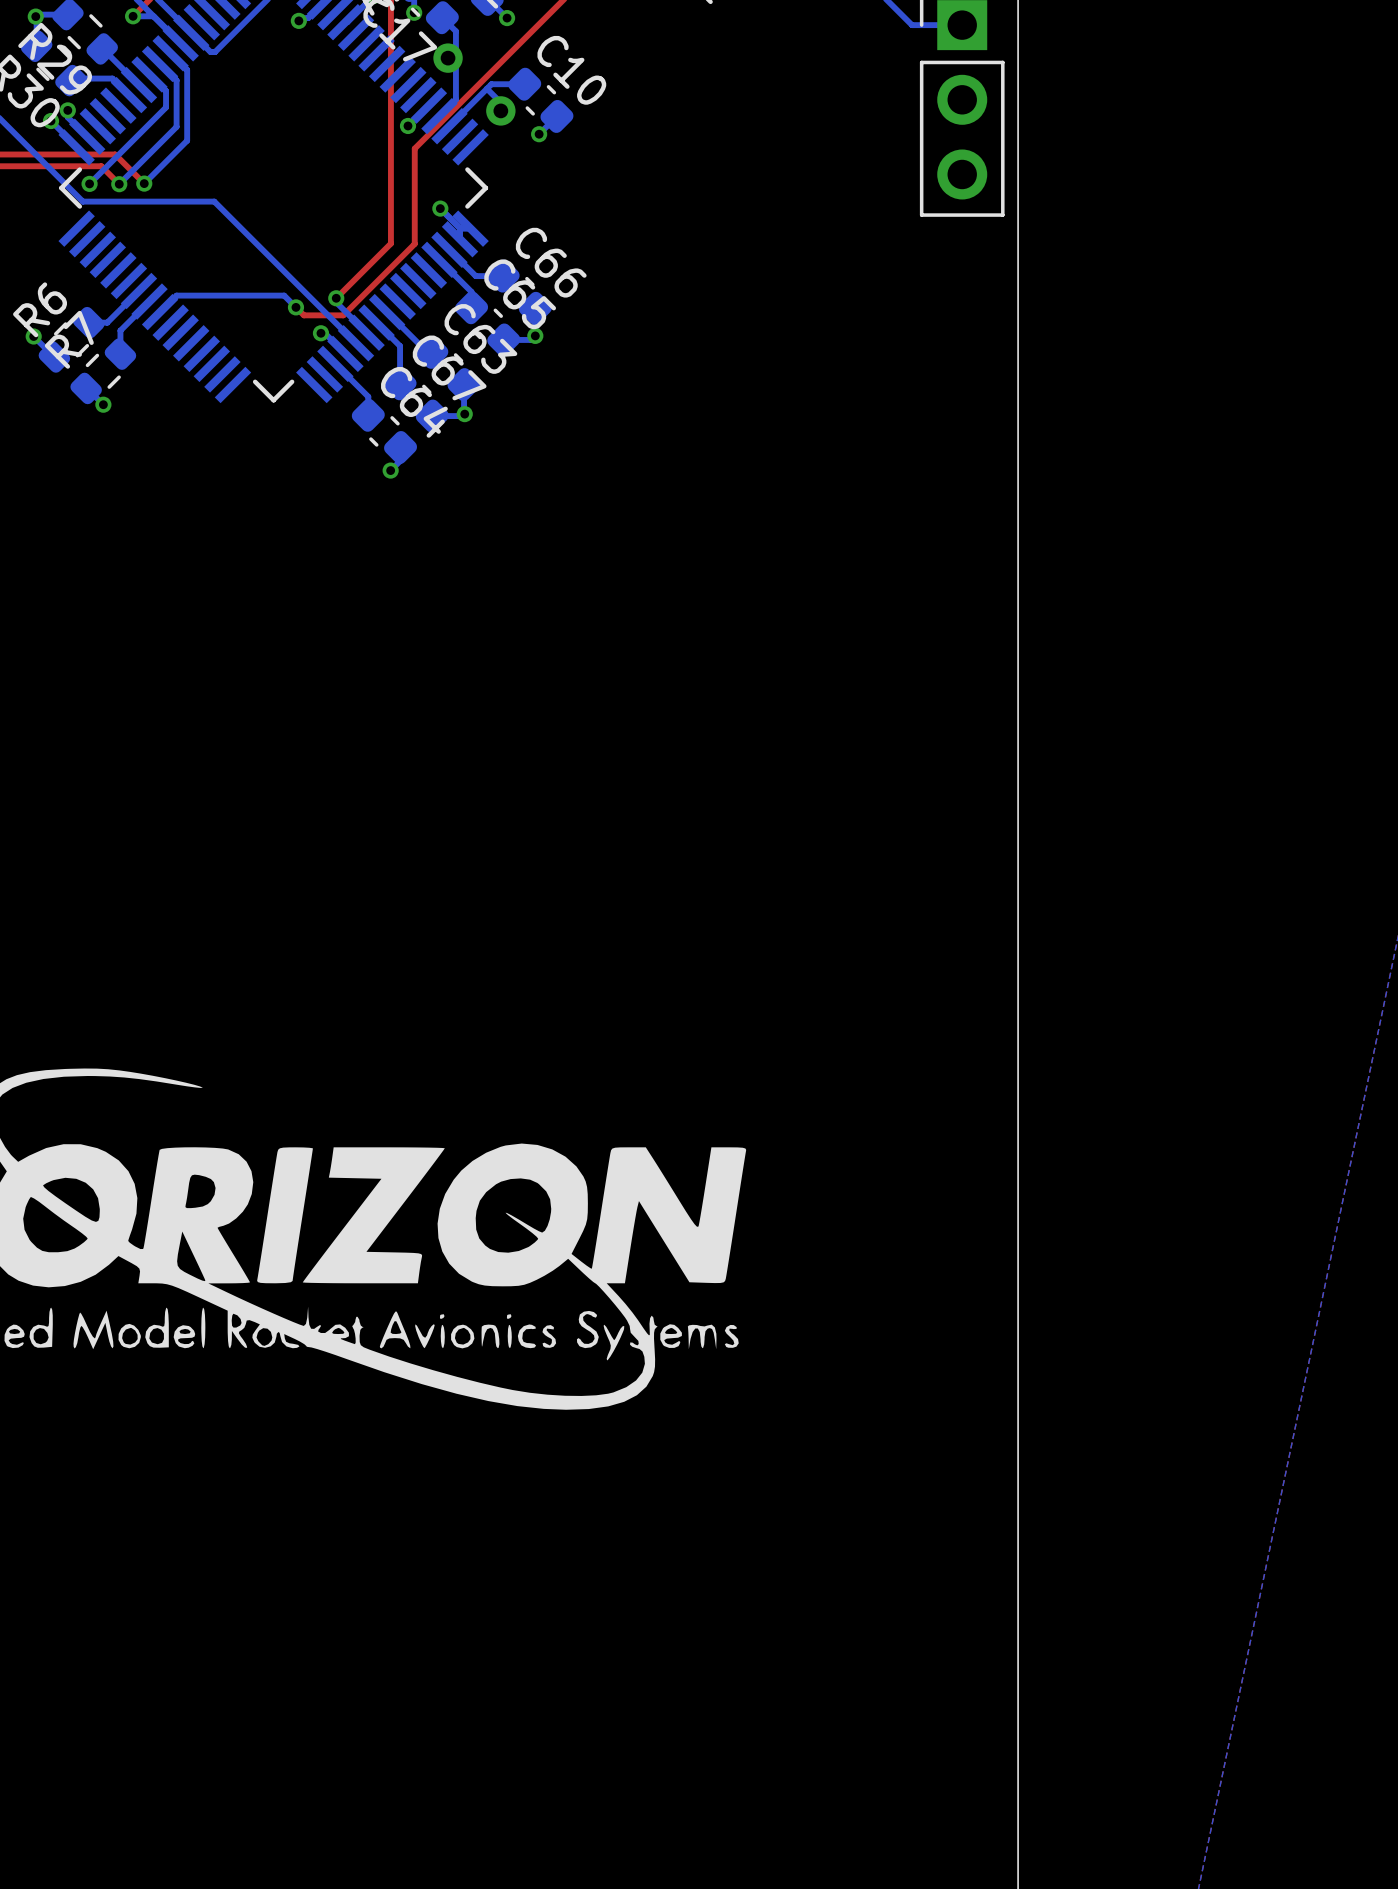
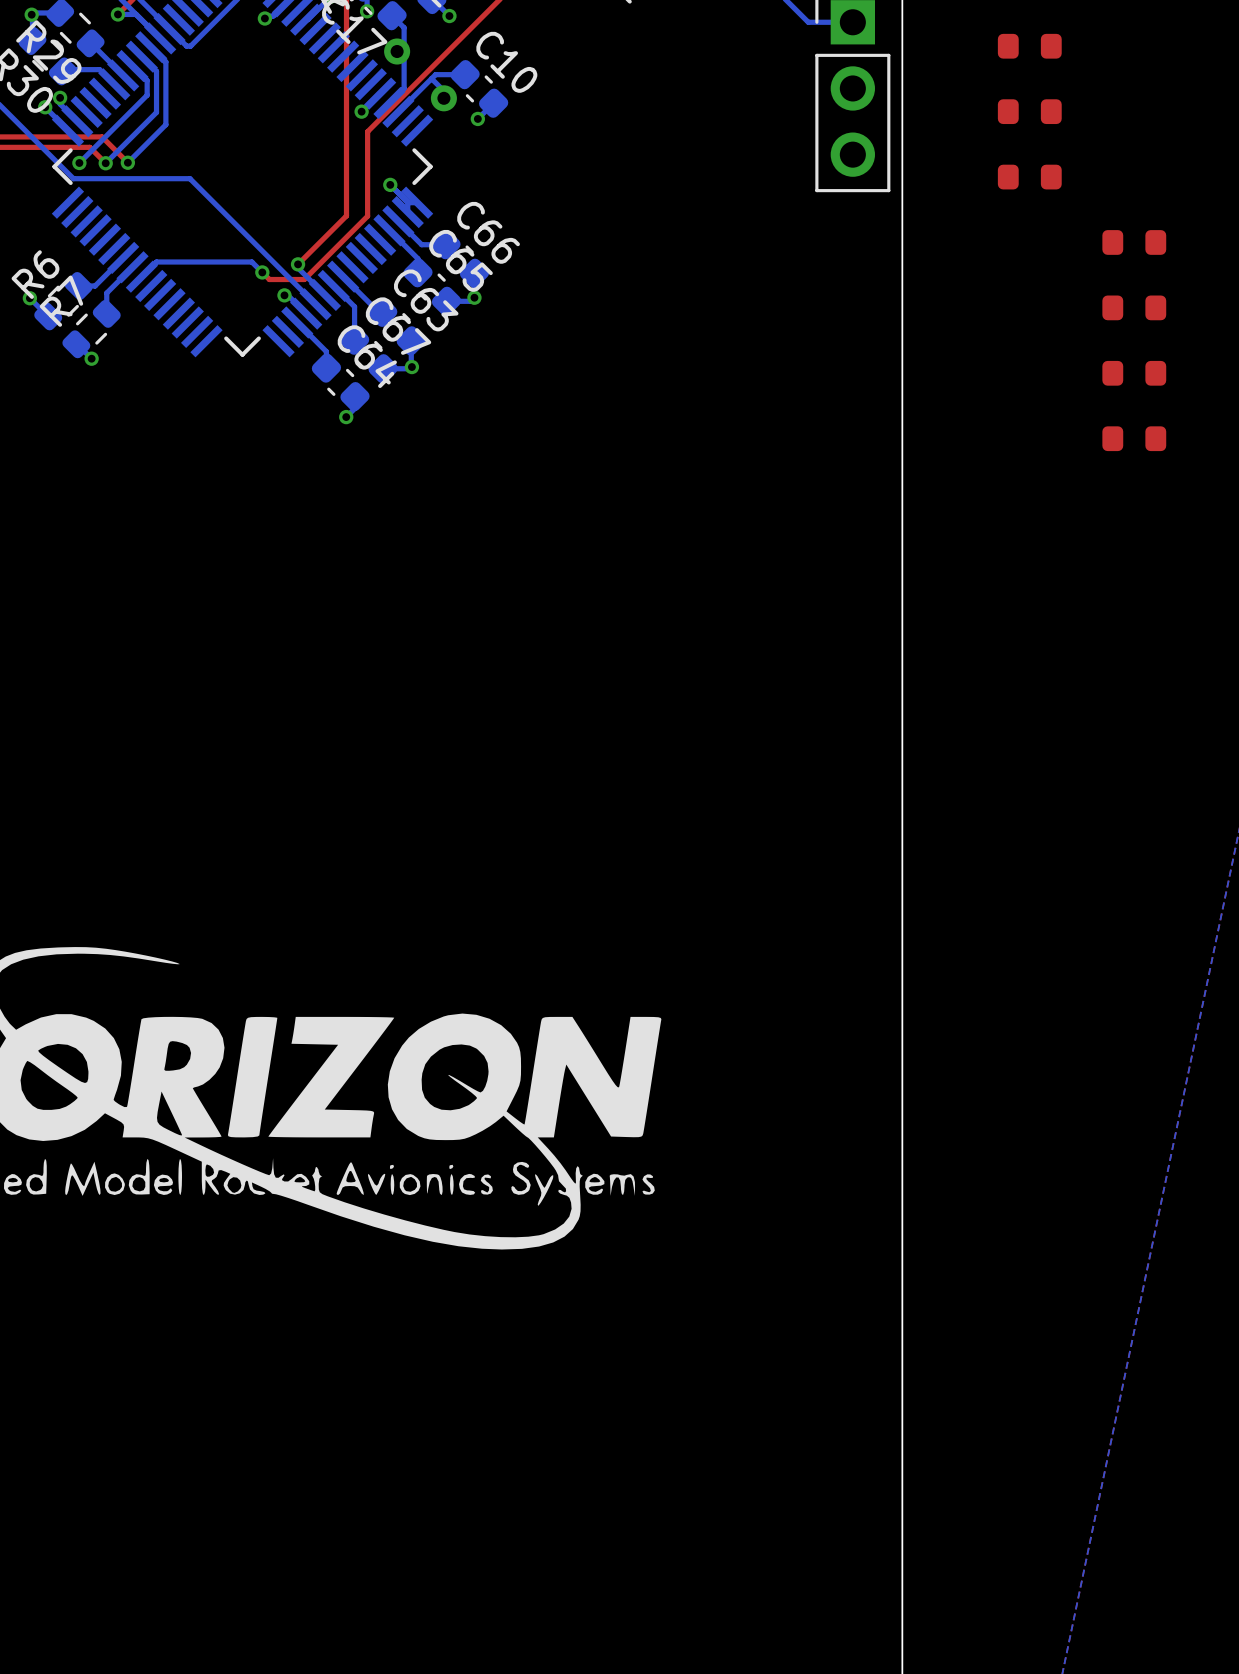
part: none -> (1029, 46)
part: none -> (1029, 111)
part: none -> (1029, 177)
part: none -> (1134, 242)
part: none -> (1134, 307)
part: none -> (1134, 373)
part: none -> (1134, 438)

